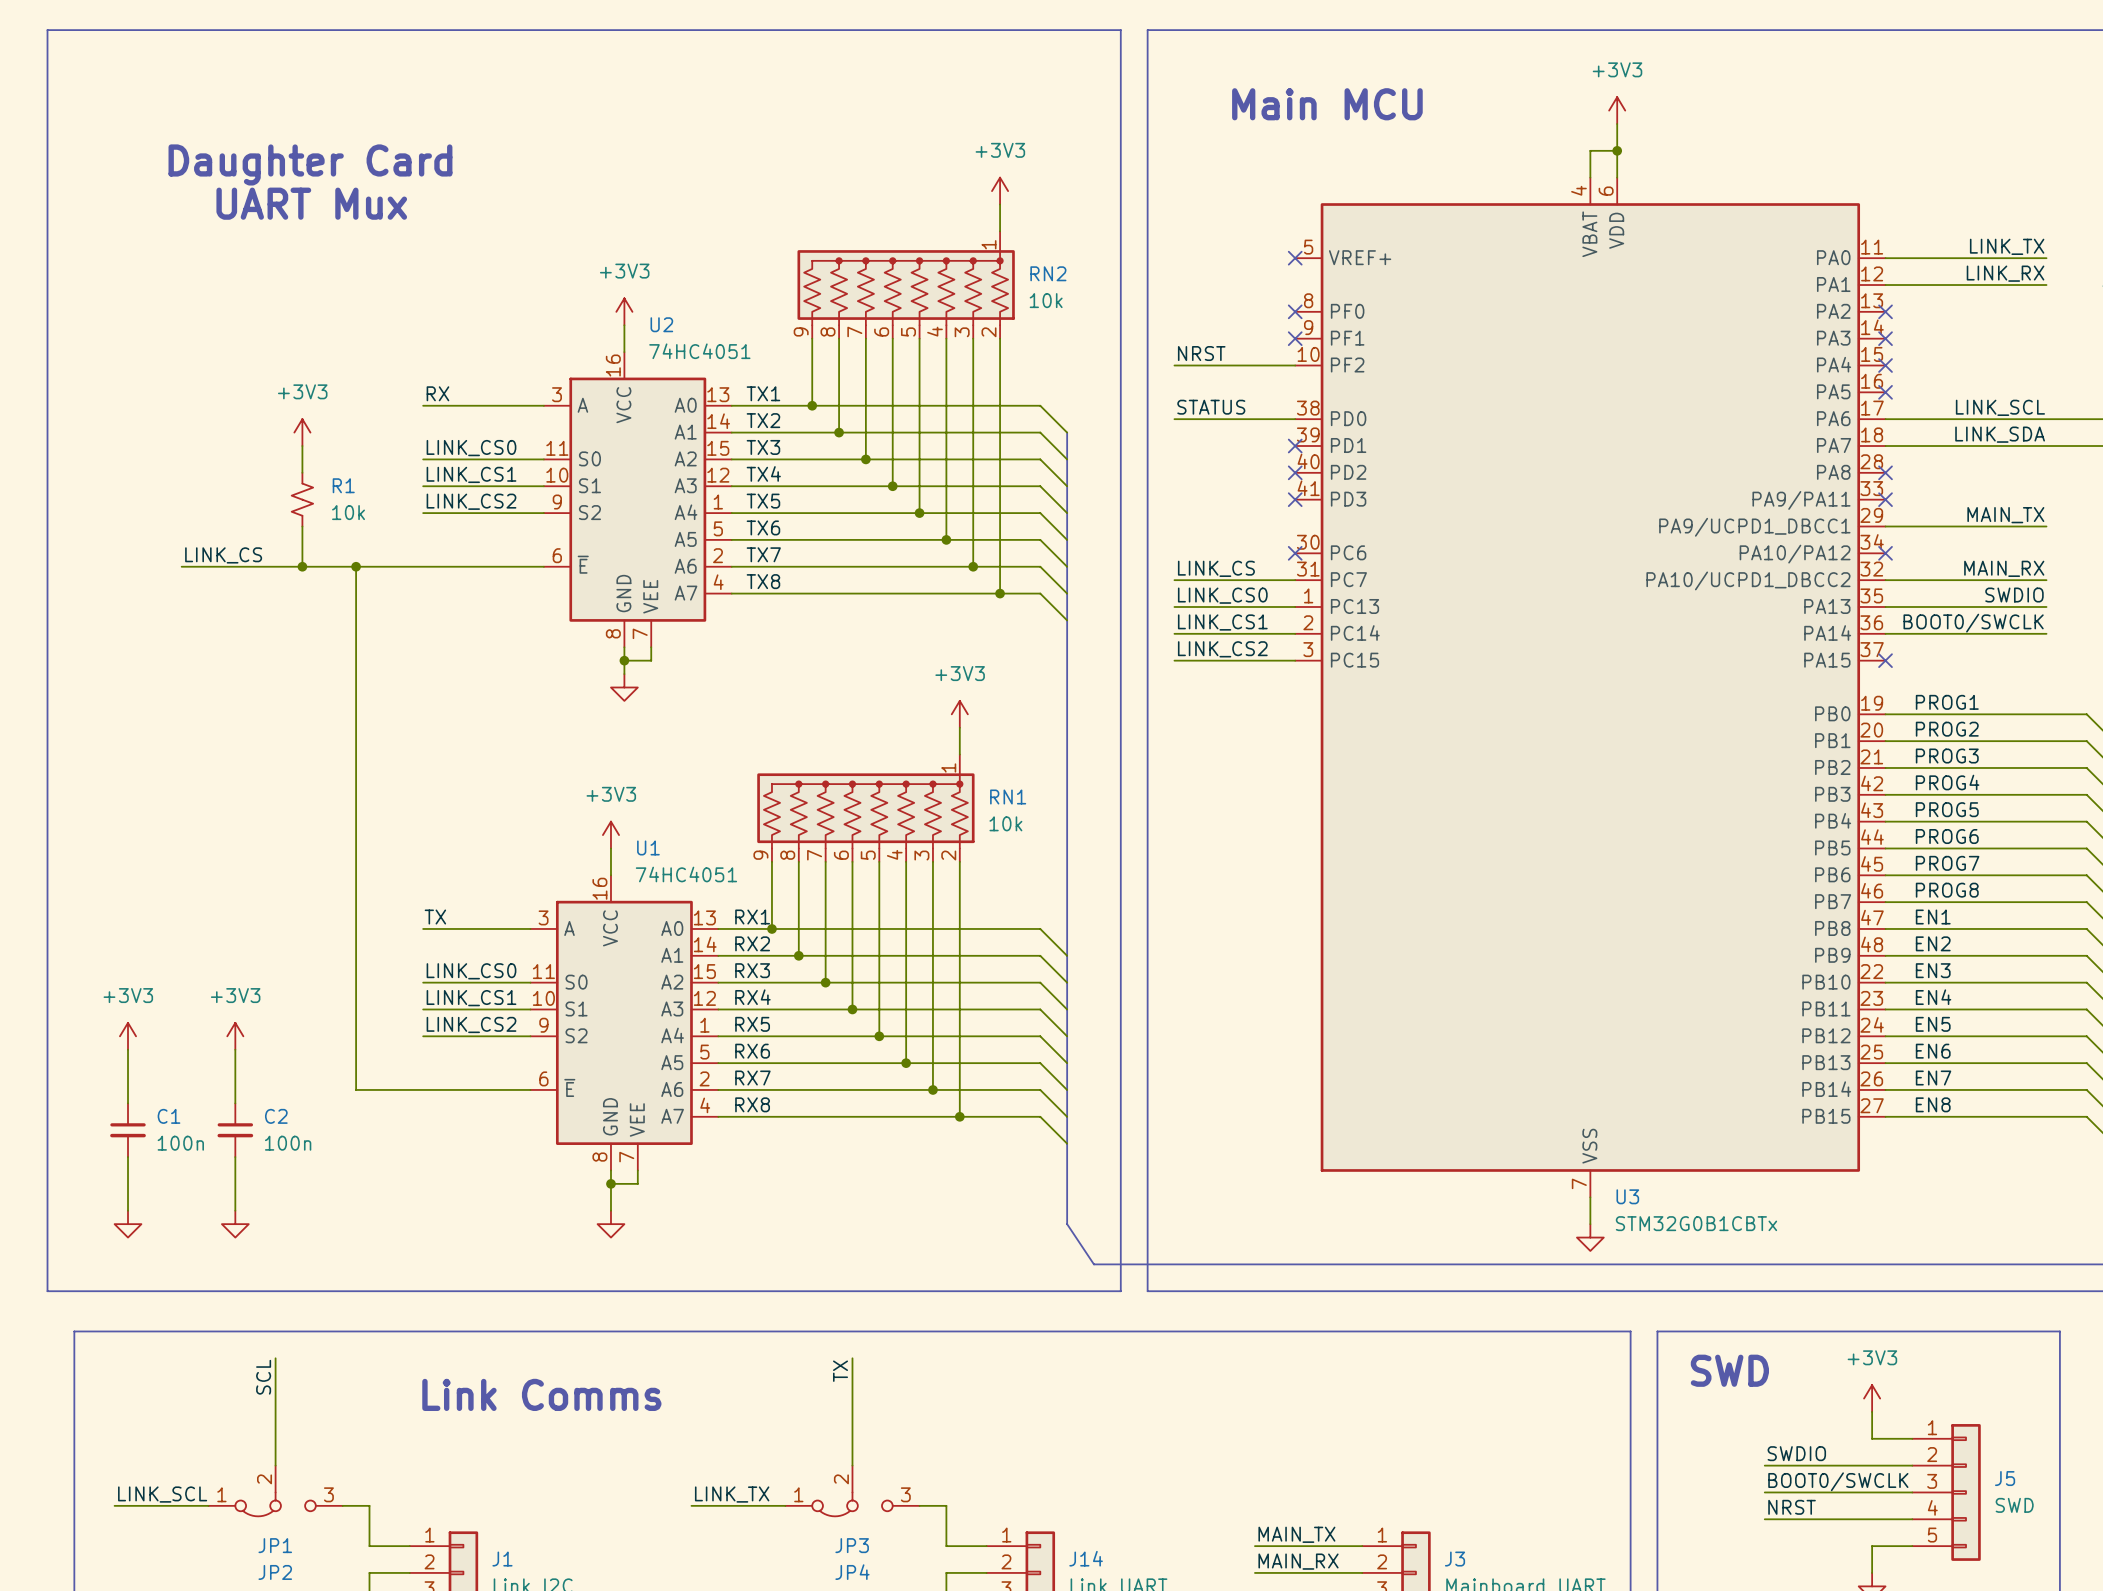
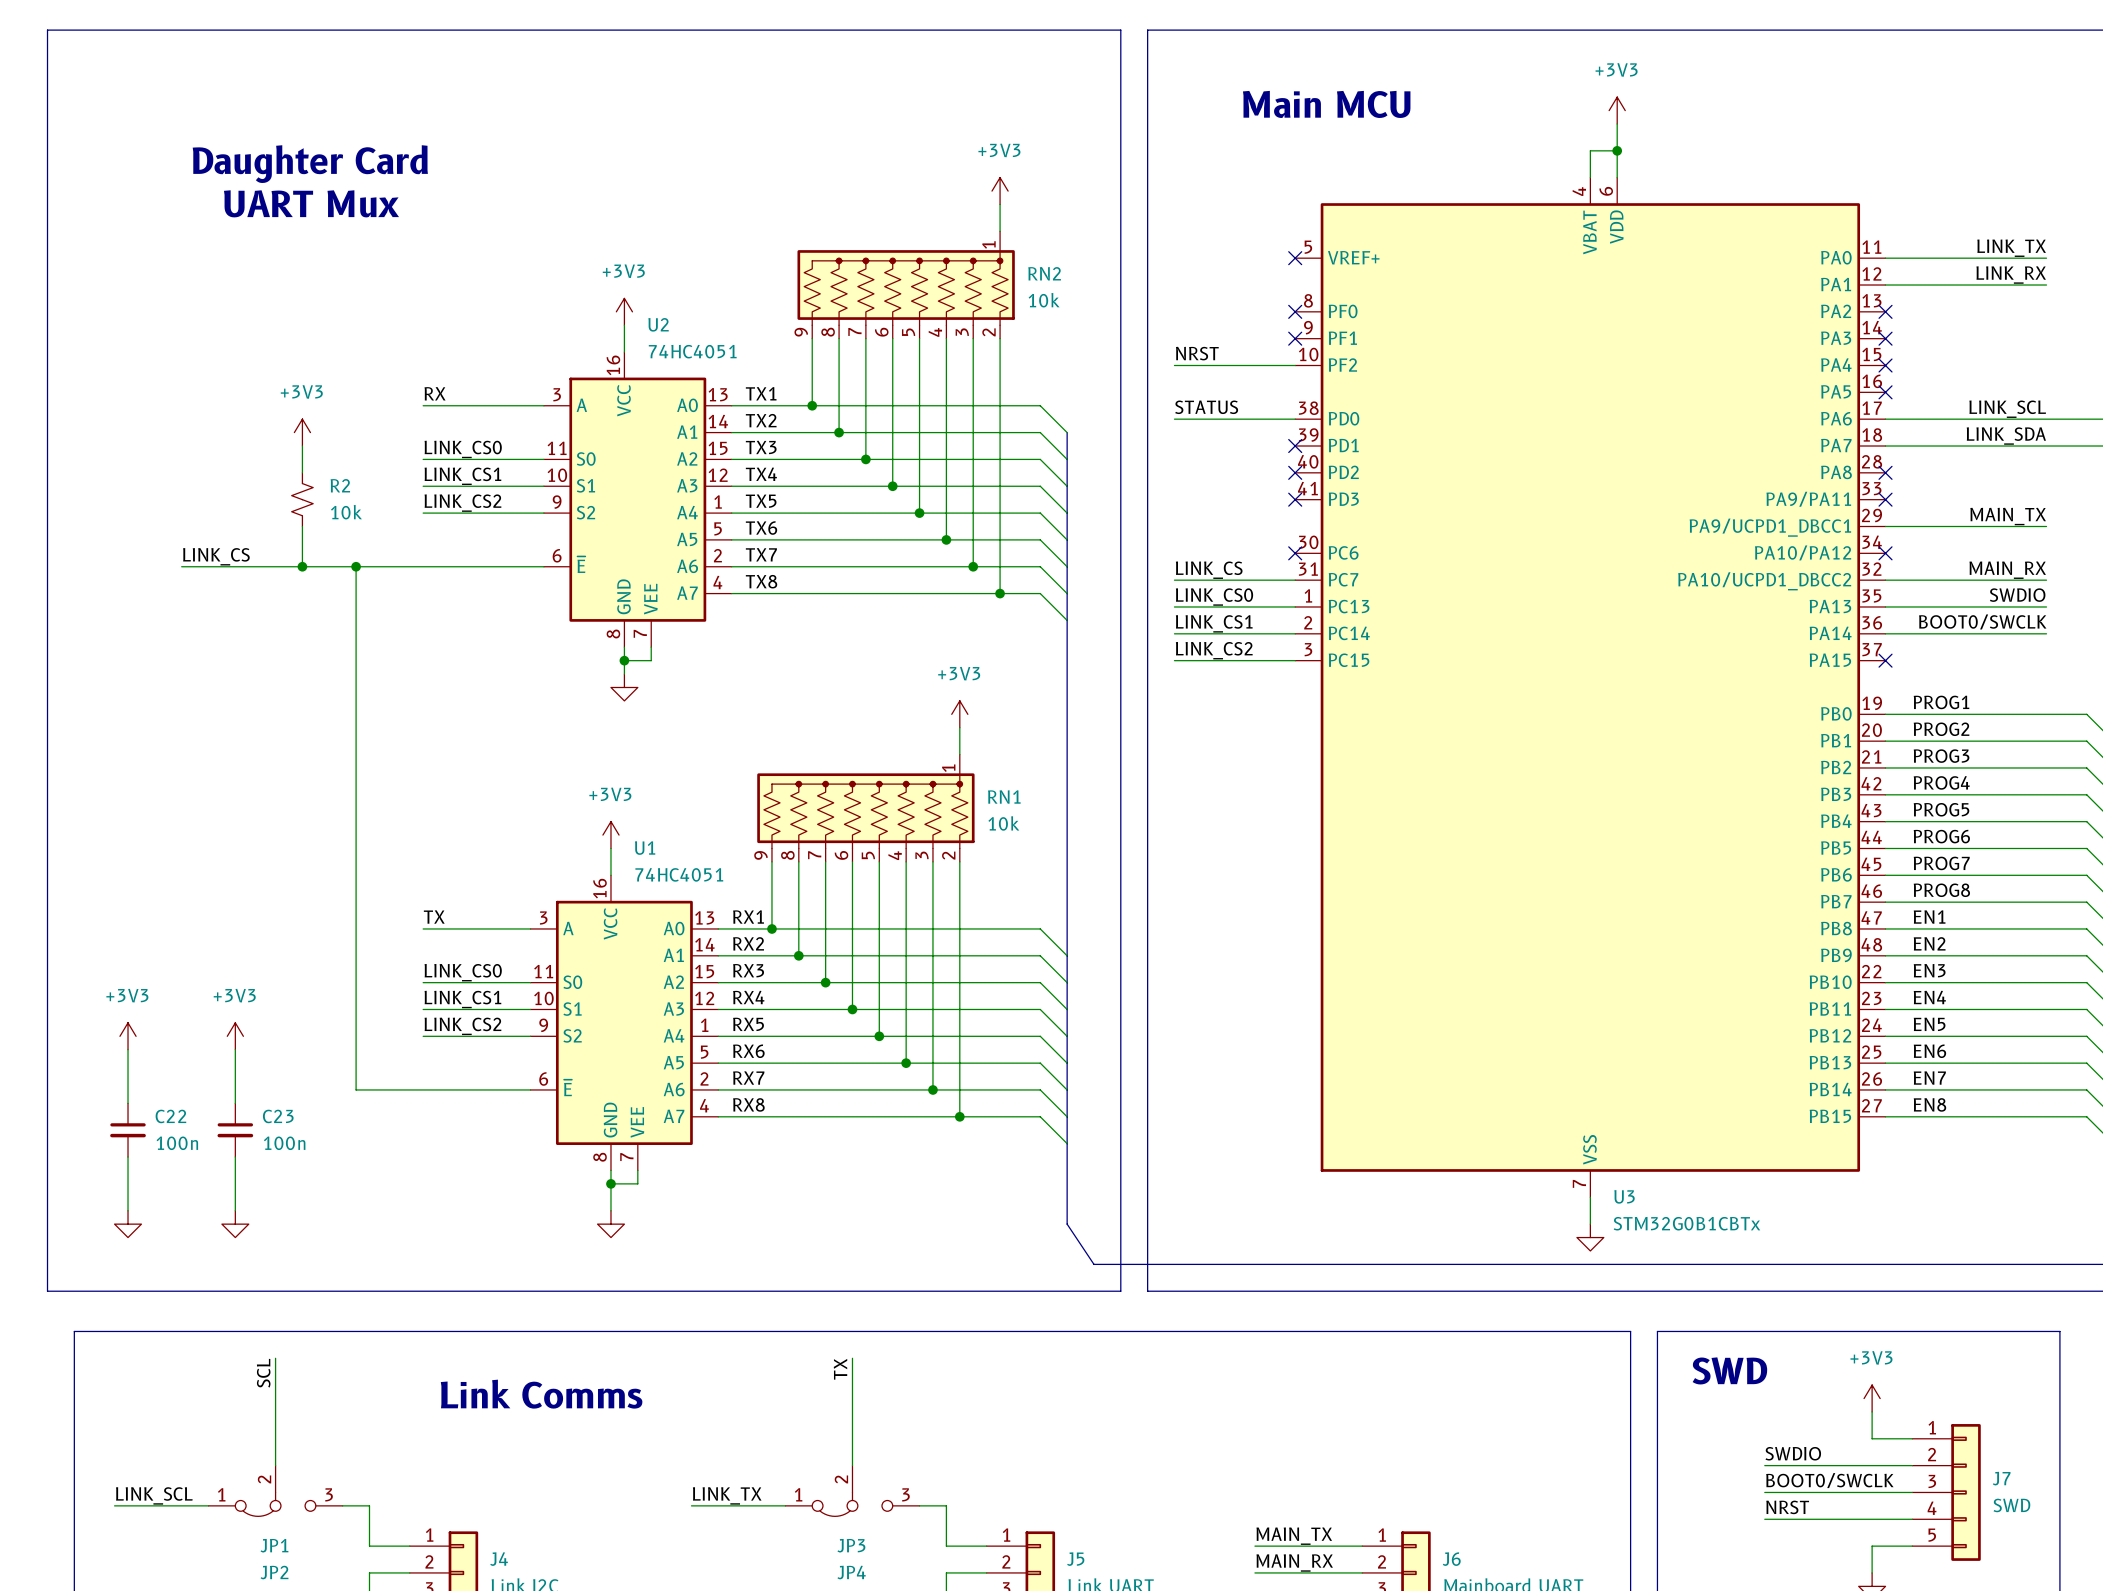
R1 name: R1 (343, 485) -> R2 (340, 485)
C1 name: C1 (168, 1116) -> C22 (170, 1116)
C2 name: C2 (276, 1116) -> C23 (278, 1116)
J5 name: J5 (2005, 1478) -> J7 (2001, 1478)
J14 name: J14 (1086, 1558) -> J5 (1075, 1559)
J1 name: J1 (502, 1559) -> J4 (499, 1559)
J3 name: J3 (1455, 1559) -> J6 (1451, 1559)

